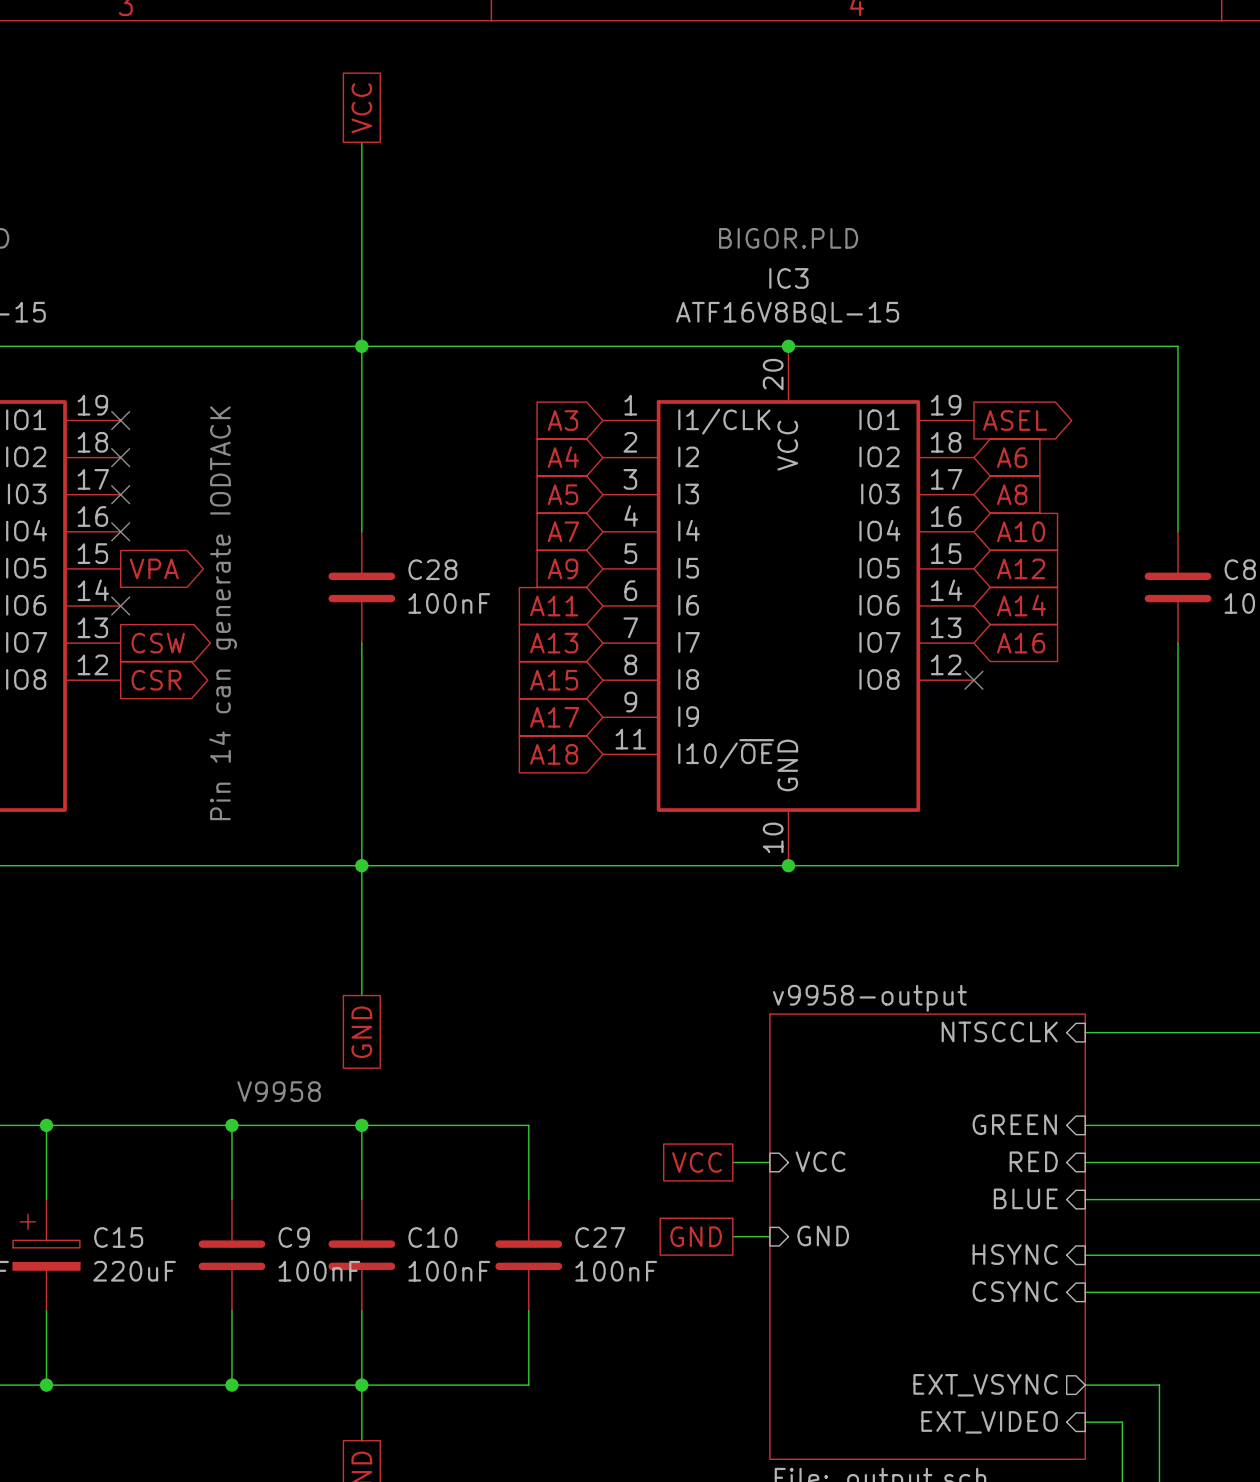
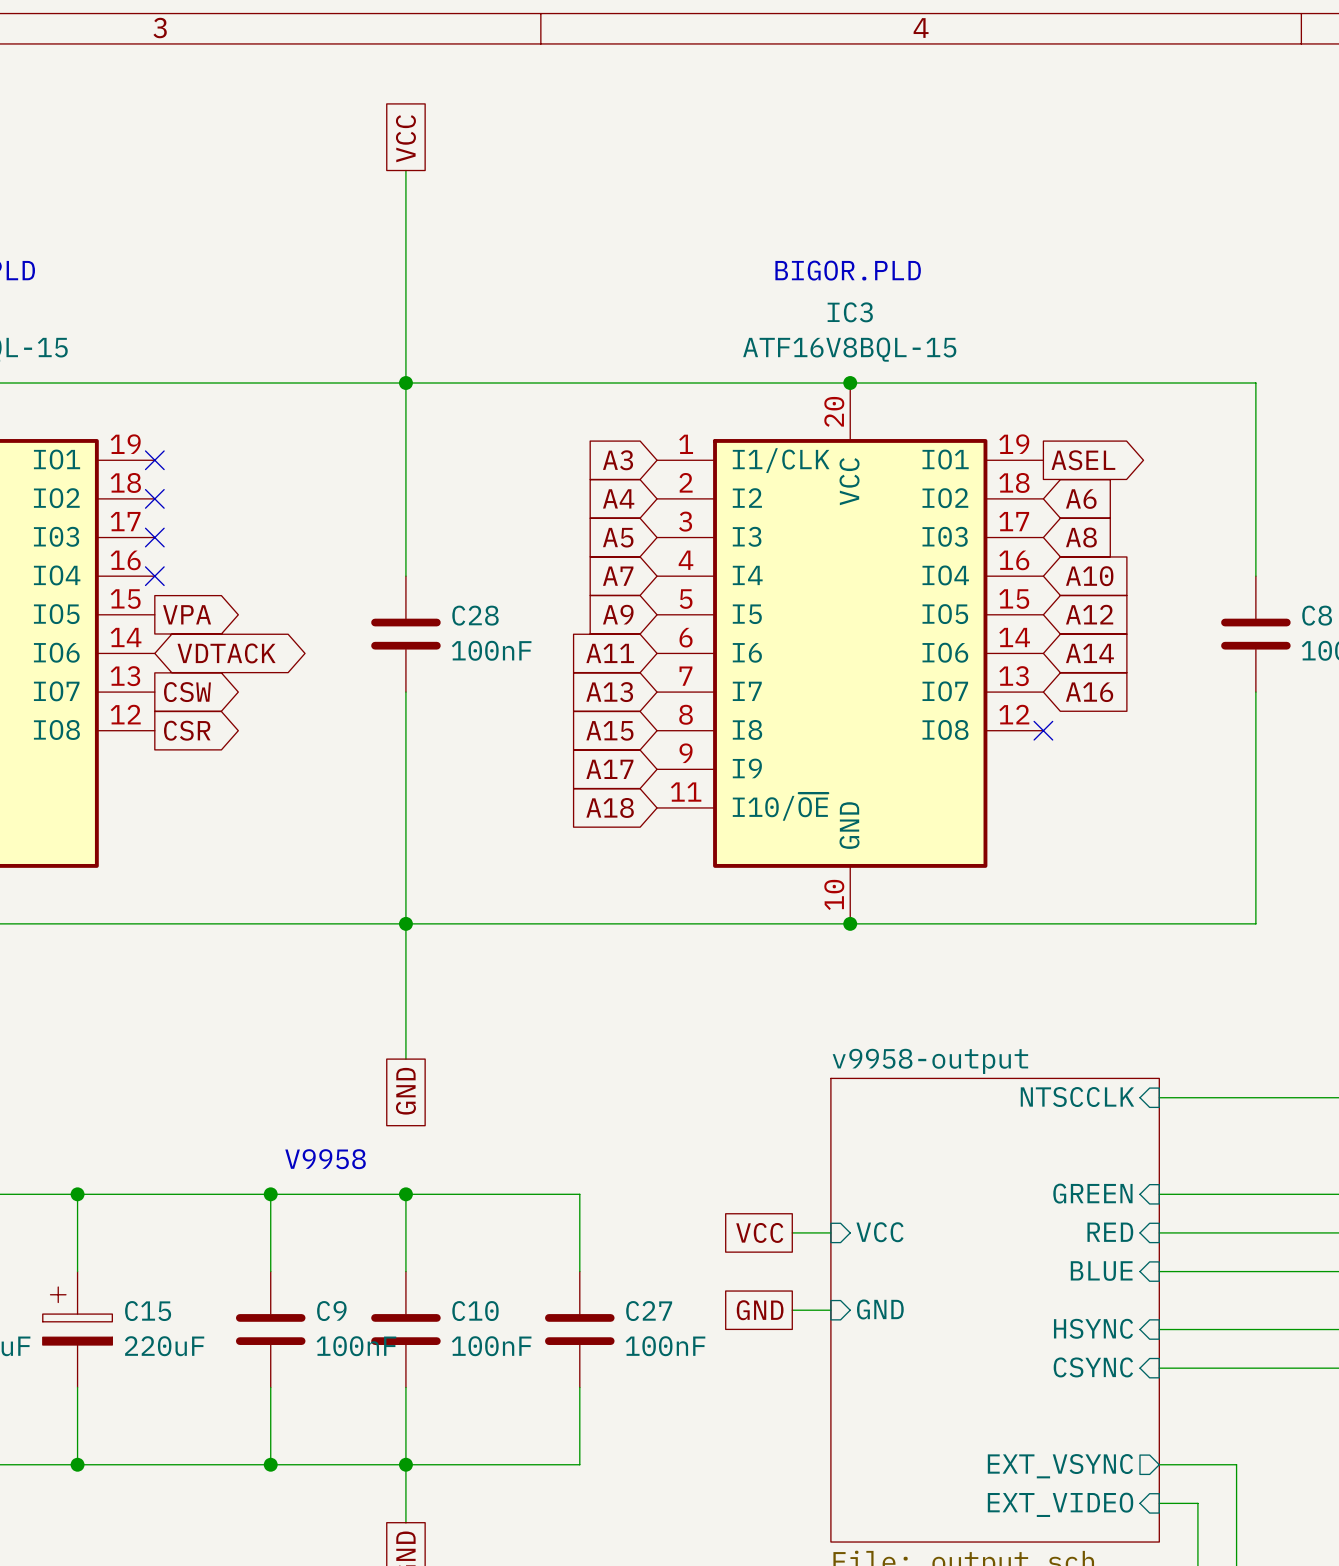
no-connect mark: (120, 606) -> none
global label: none -> VDTACK (226, 653)
text: Pin 14 can generate IODTACK (223, 613) -> none

